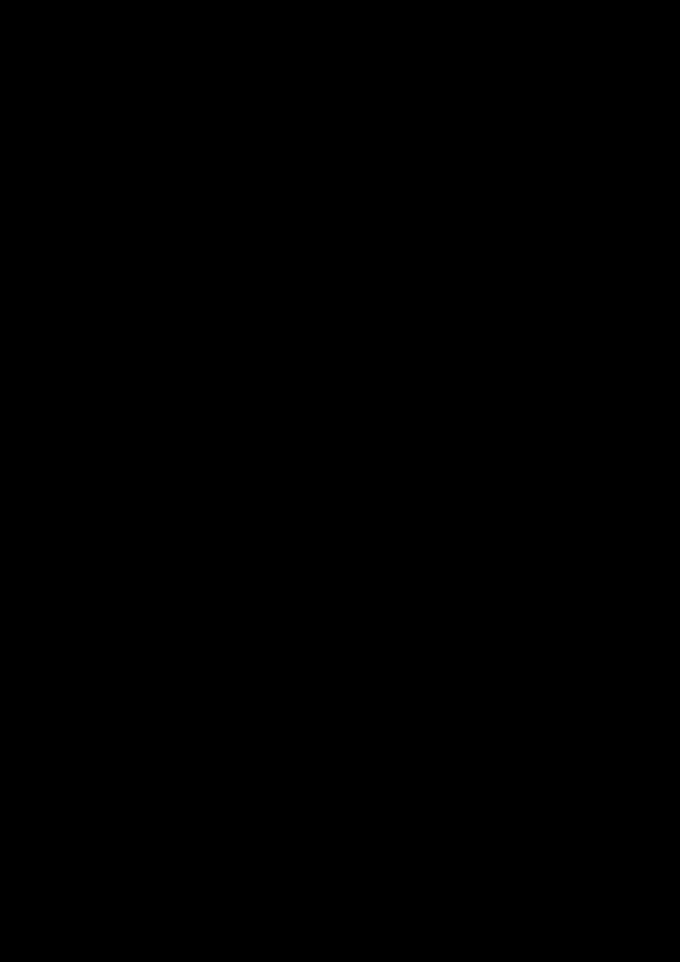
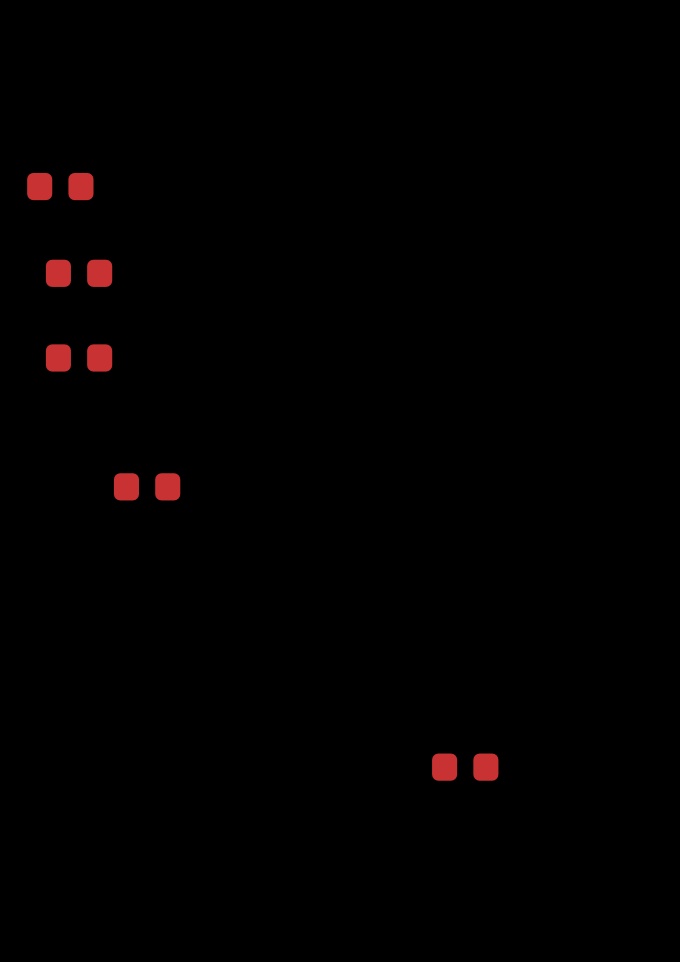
part: none -> (60, 186)
part: none -> (79, 273)
part: none -> (79, 357)
part: none -> (147, 486)
part: none -> (465, 767)

